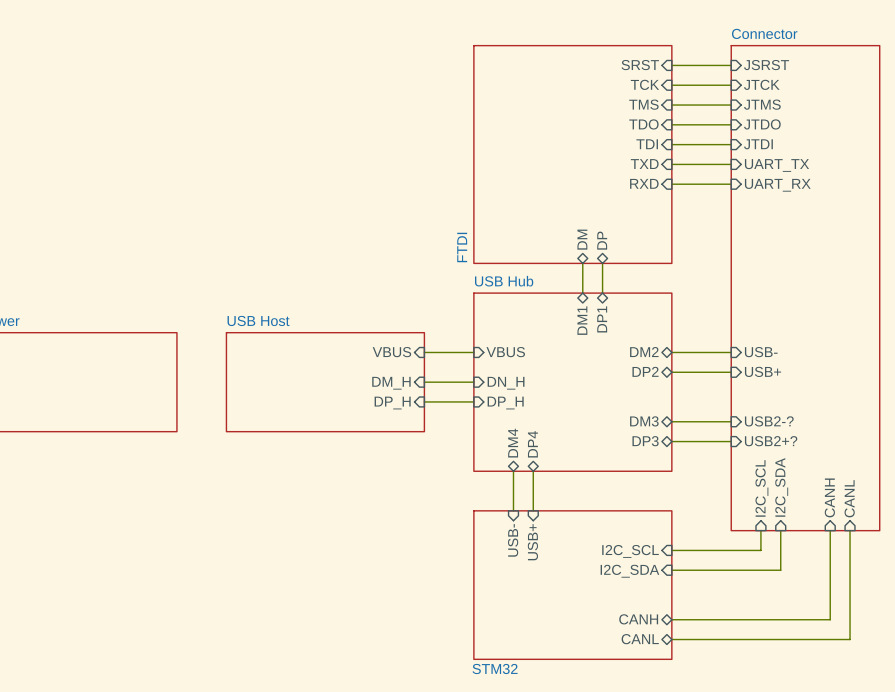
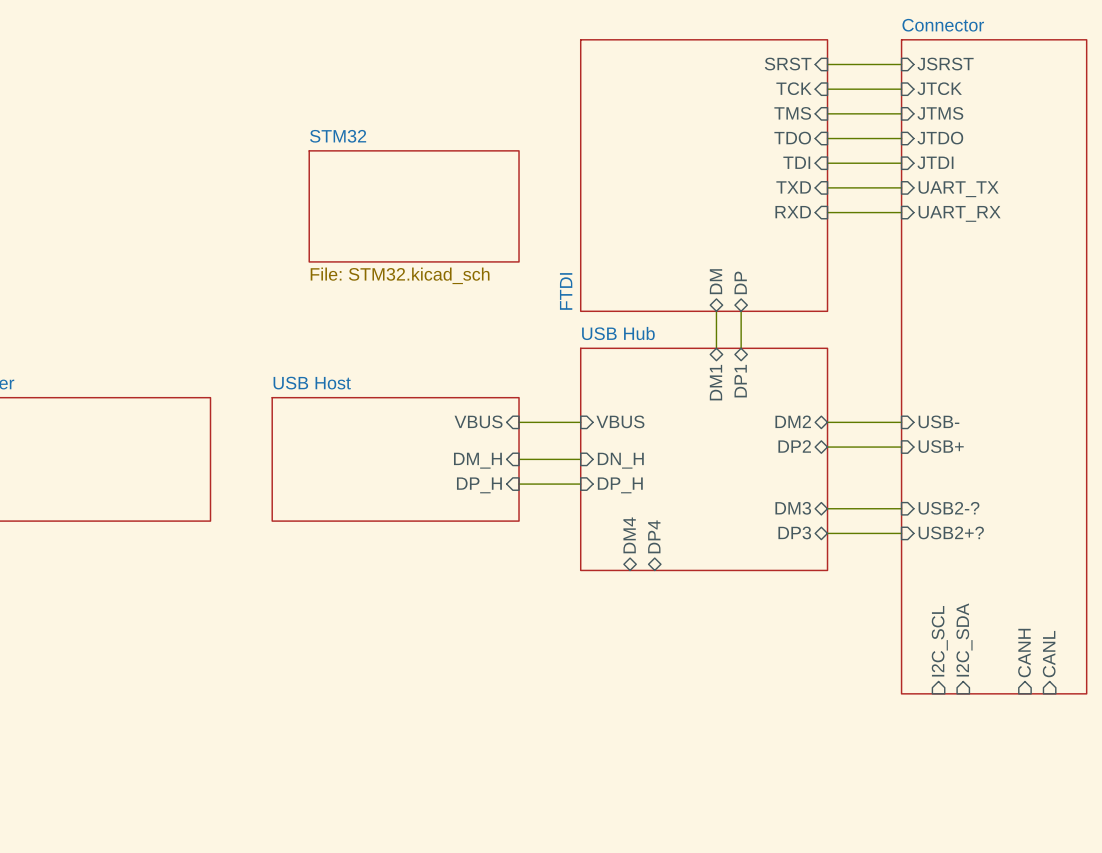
sheet STM32 value: none -> File: STM32.kicad_sch (400, 275)
sheet Connector: (805, 288) -> none
sheet Connector: none -> (994, 366)
wire: (513, 471) (513, 510) -> none
wire: (533, 471) (533, 510) -> none
sheet pin position: I2C_SDA (781, 487) -> I2C_SDA (964, 639)
sheet pin position: I2C_SCL (761, 488) -> I2C_SCL (939, 641)
sheet pin position: CANH (829, 497) -> CANH (1024, 653)
sheet pin position: CANL (849, 498) -> CANL (1049, 654)
sheet STM32 shape: [473, 510, 673, 660] -> [308, 150, 520, 263]
wire: (760, 530) (760, 550) (671, 550) -> none
wire: (780, 530) (780, 570) (671, 570) -> none
wire: (830, 530) (830, 619) (671, 619) -> none
wire: (850, 530) (850, 639) (671, 639) -> none
sheet pin: USB- (513, 540) -> none
sheet pin: USB+ (532, 542) -> none
sheet pin: I2C_SCL (630, 551) -> none
sheet pin: I2C_SDA (629, 571) -> none
sheet pin: CANH (638, 619) -> none
sheet pin: CANL (640, 639) -> none
sheet STM32 name position: STM32 (495, 668) -> STM32 (338, 136)

